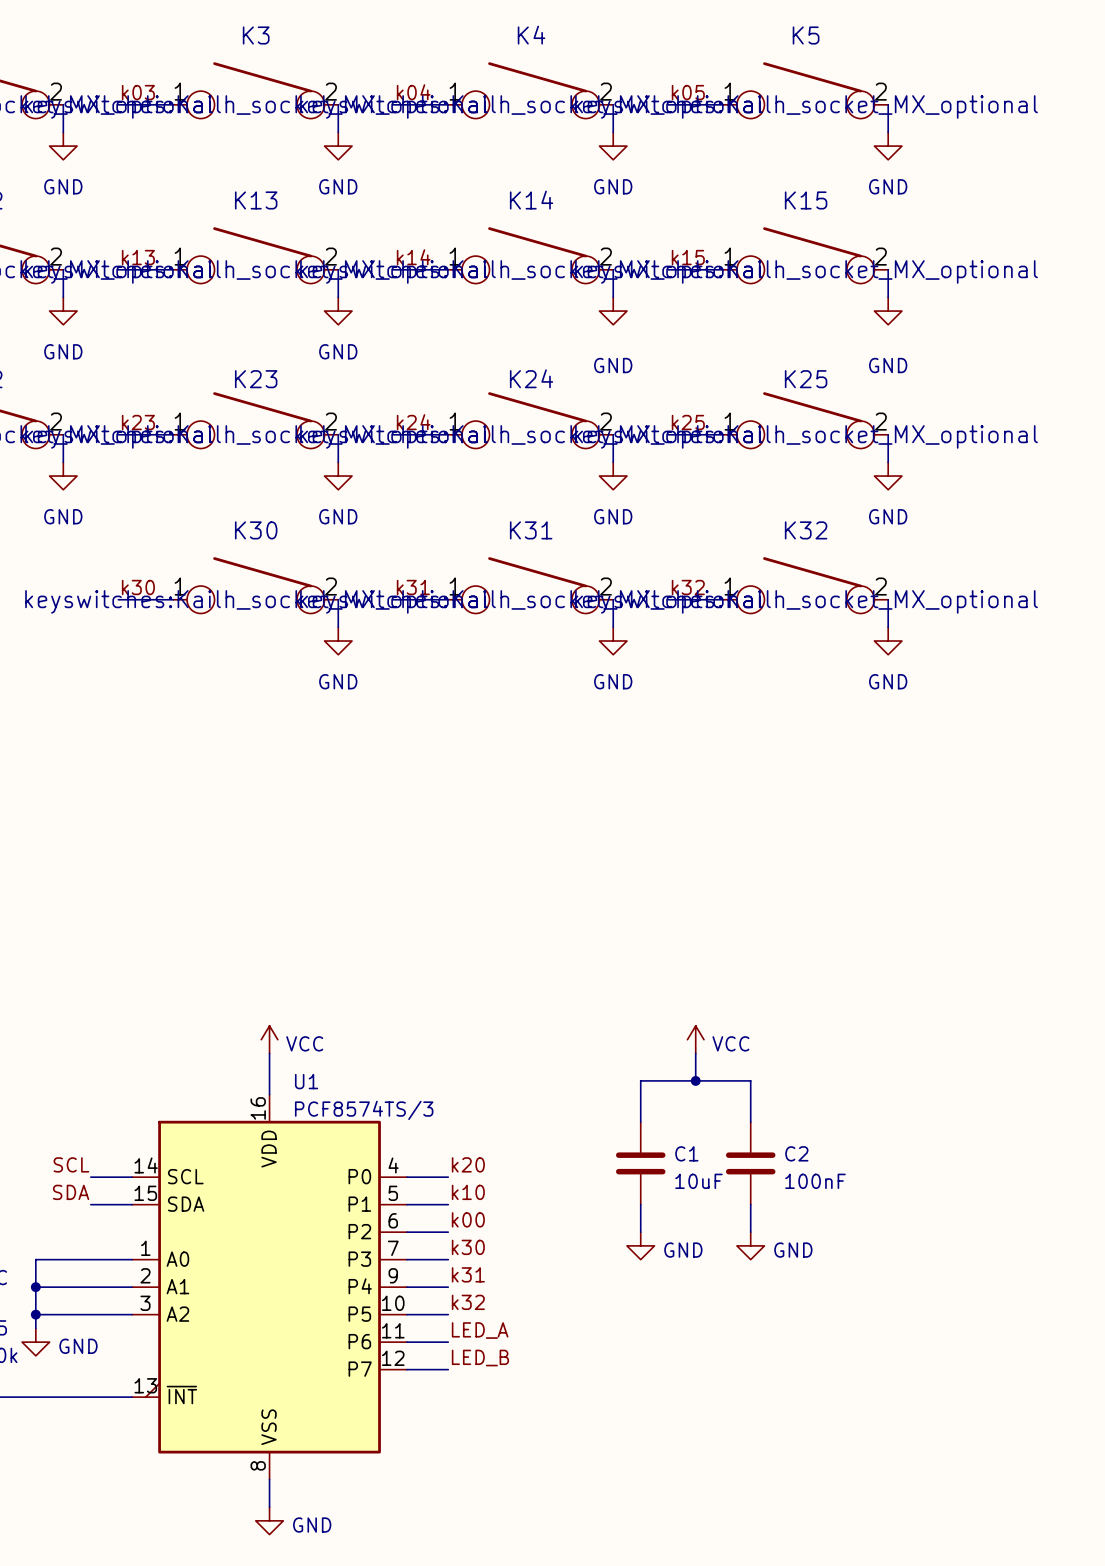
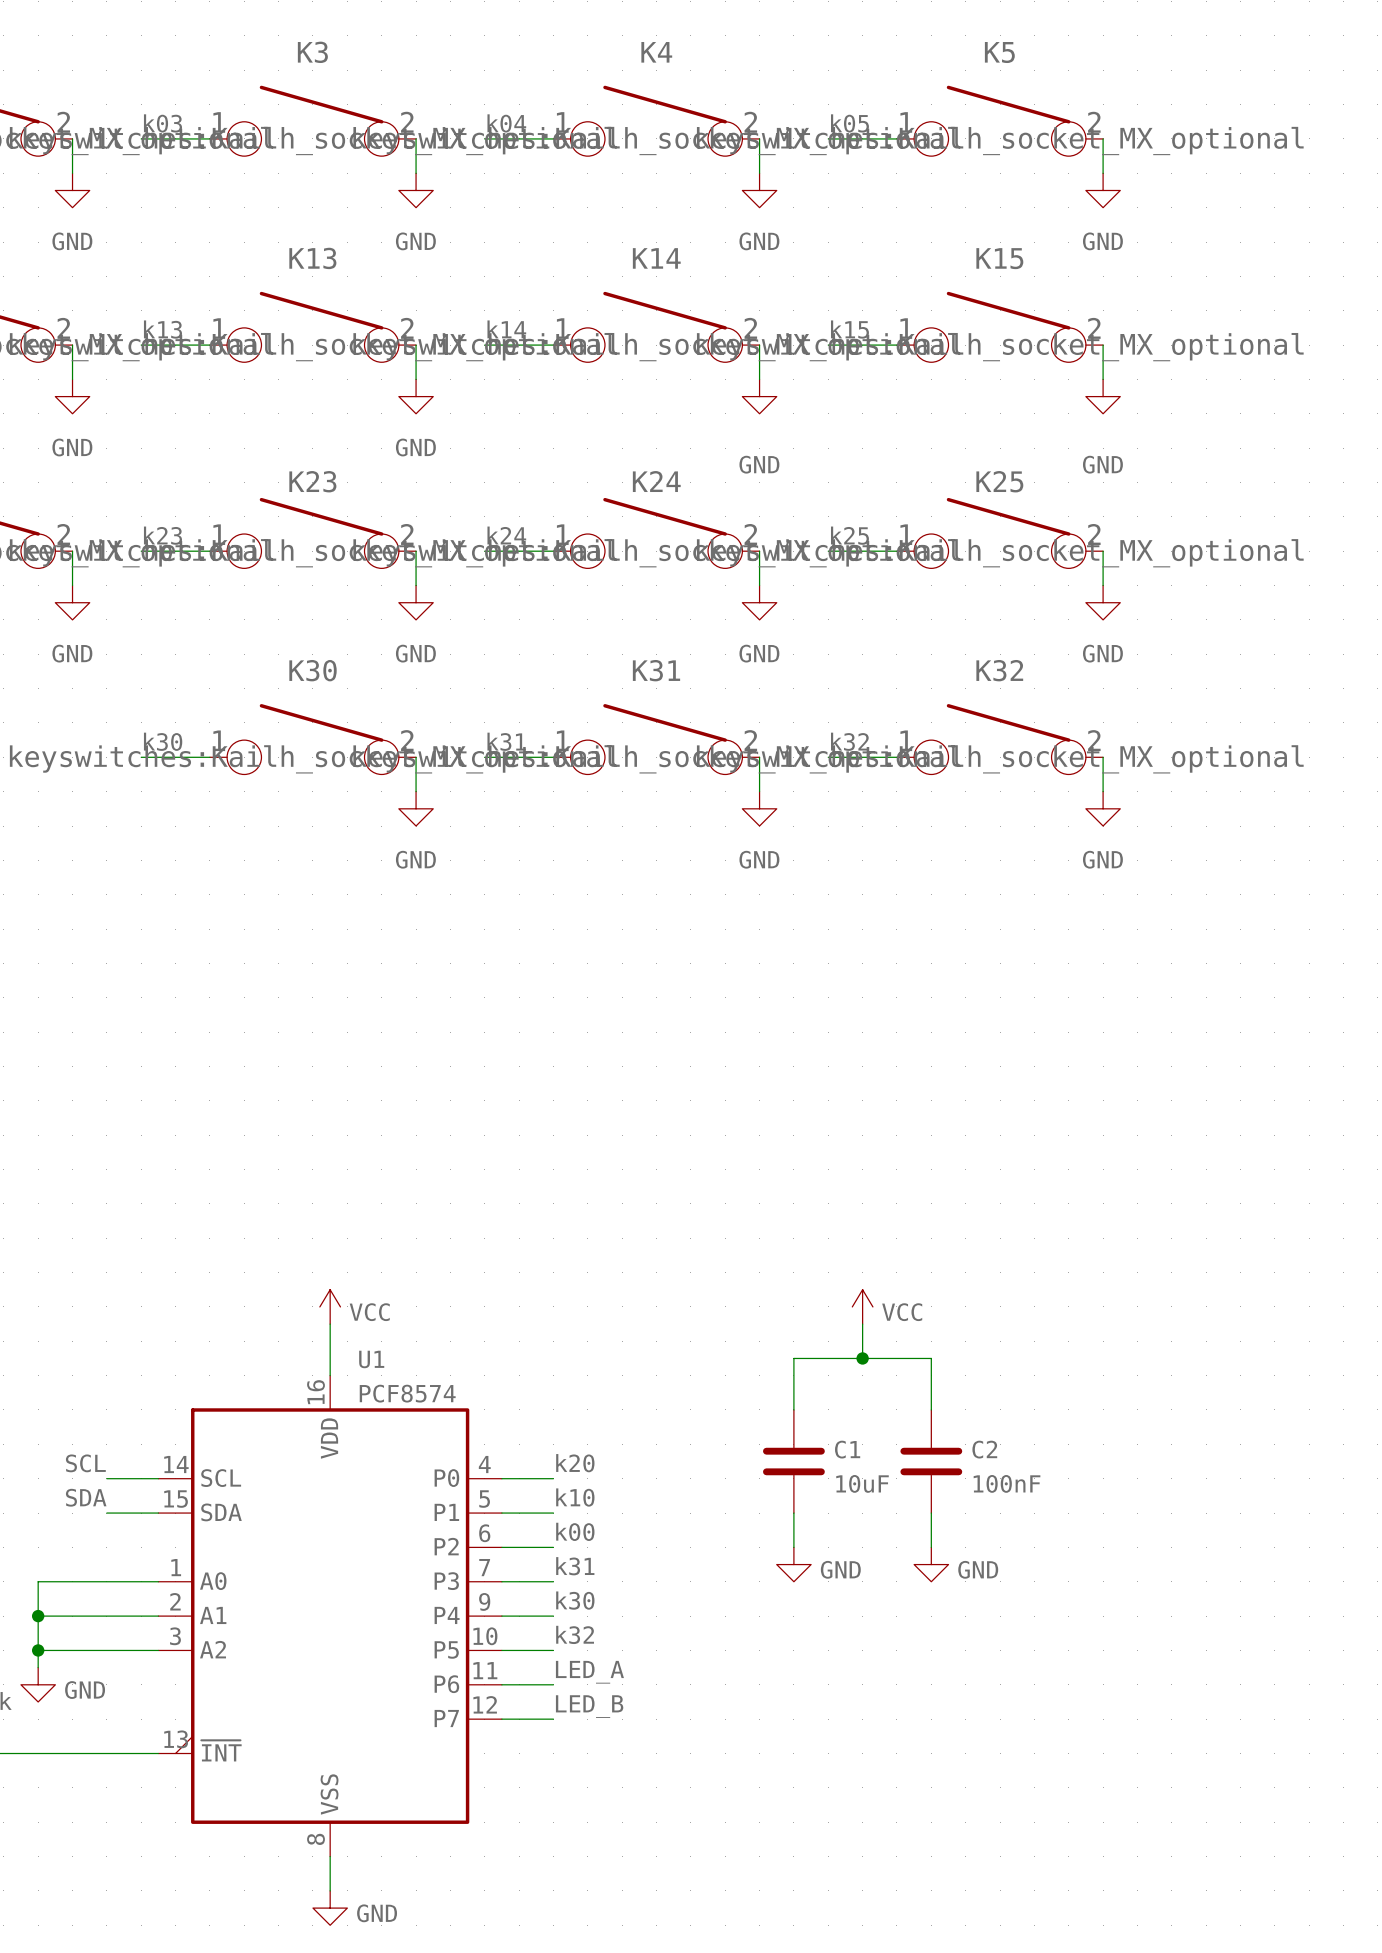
U1 value: PCF8574TS/3 (364, 1110) -> PCF8574 (407, 1393)
label: k30 (468, 1247) -> k31 (575, 1566)
label: k31 (468, 1274) -> k30 (575, 1600)

